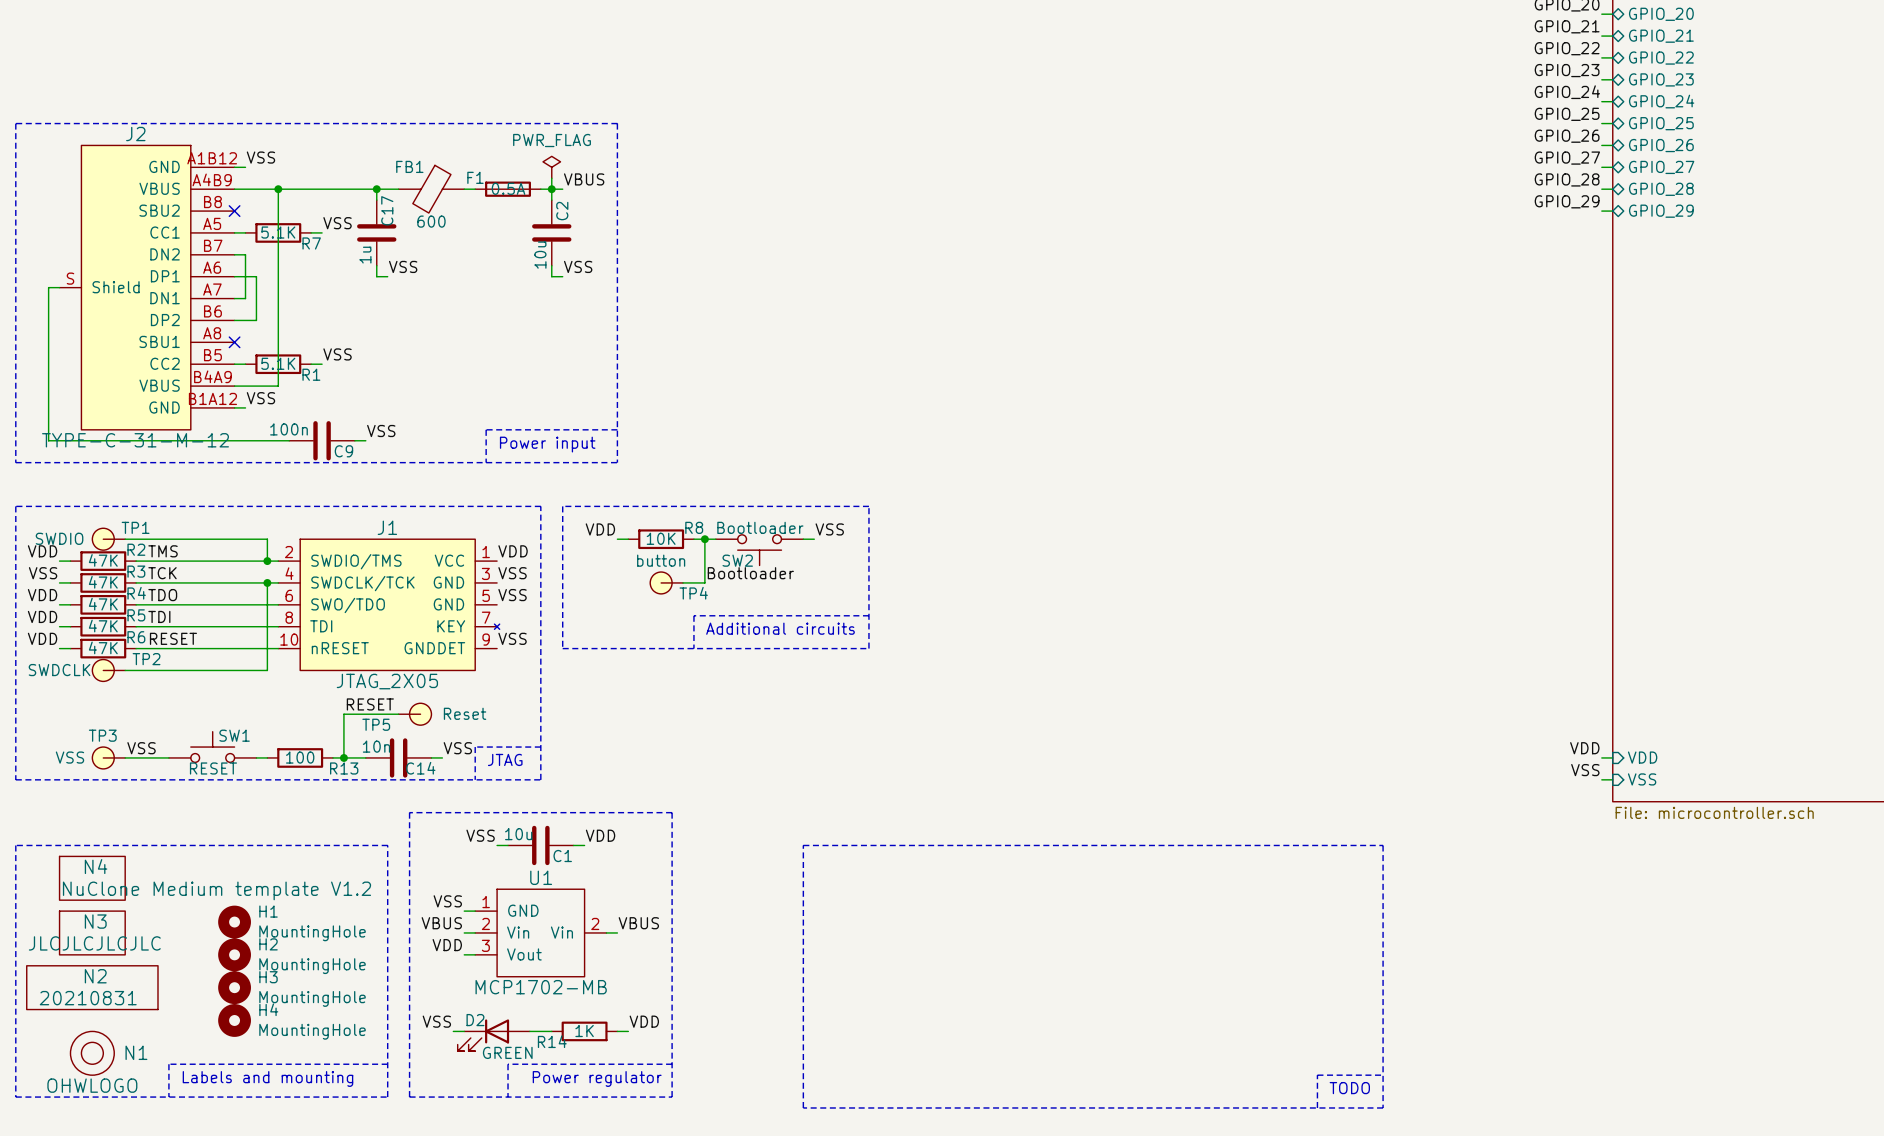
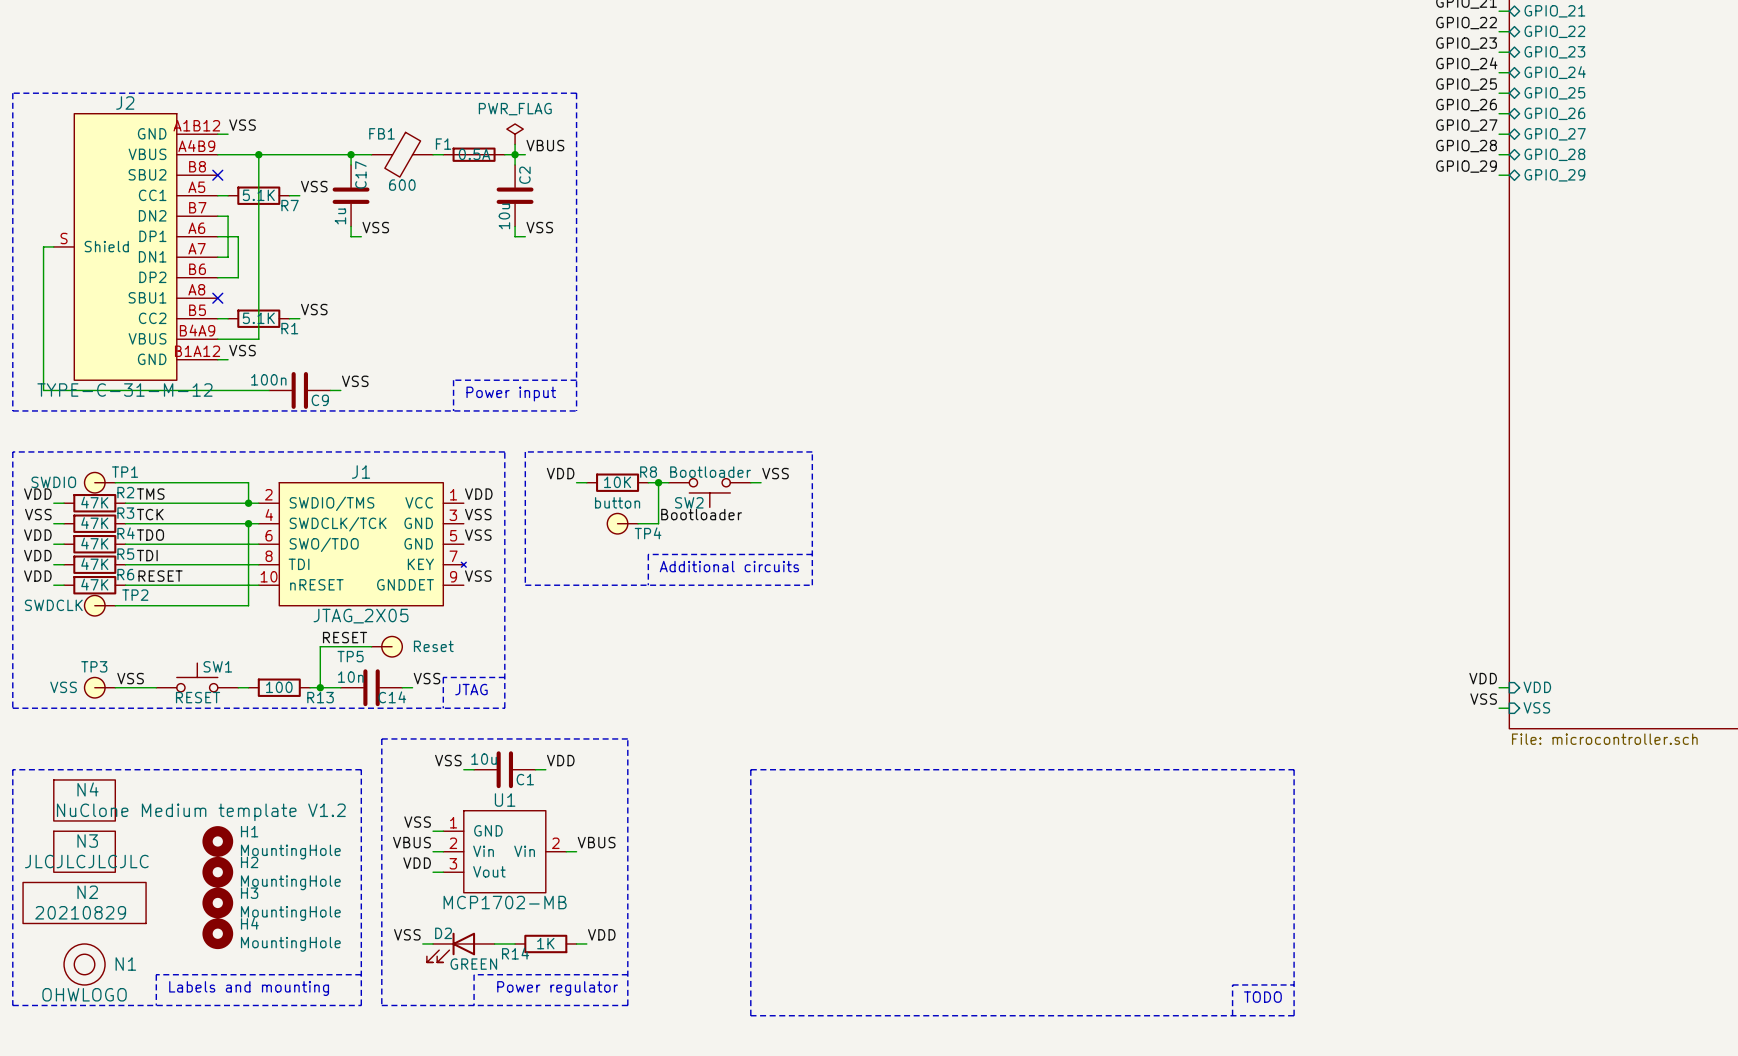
N2 value: 20210831 (88, 998) -> 20210829 (80, 912)

